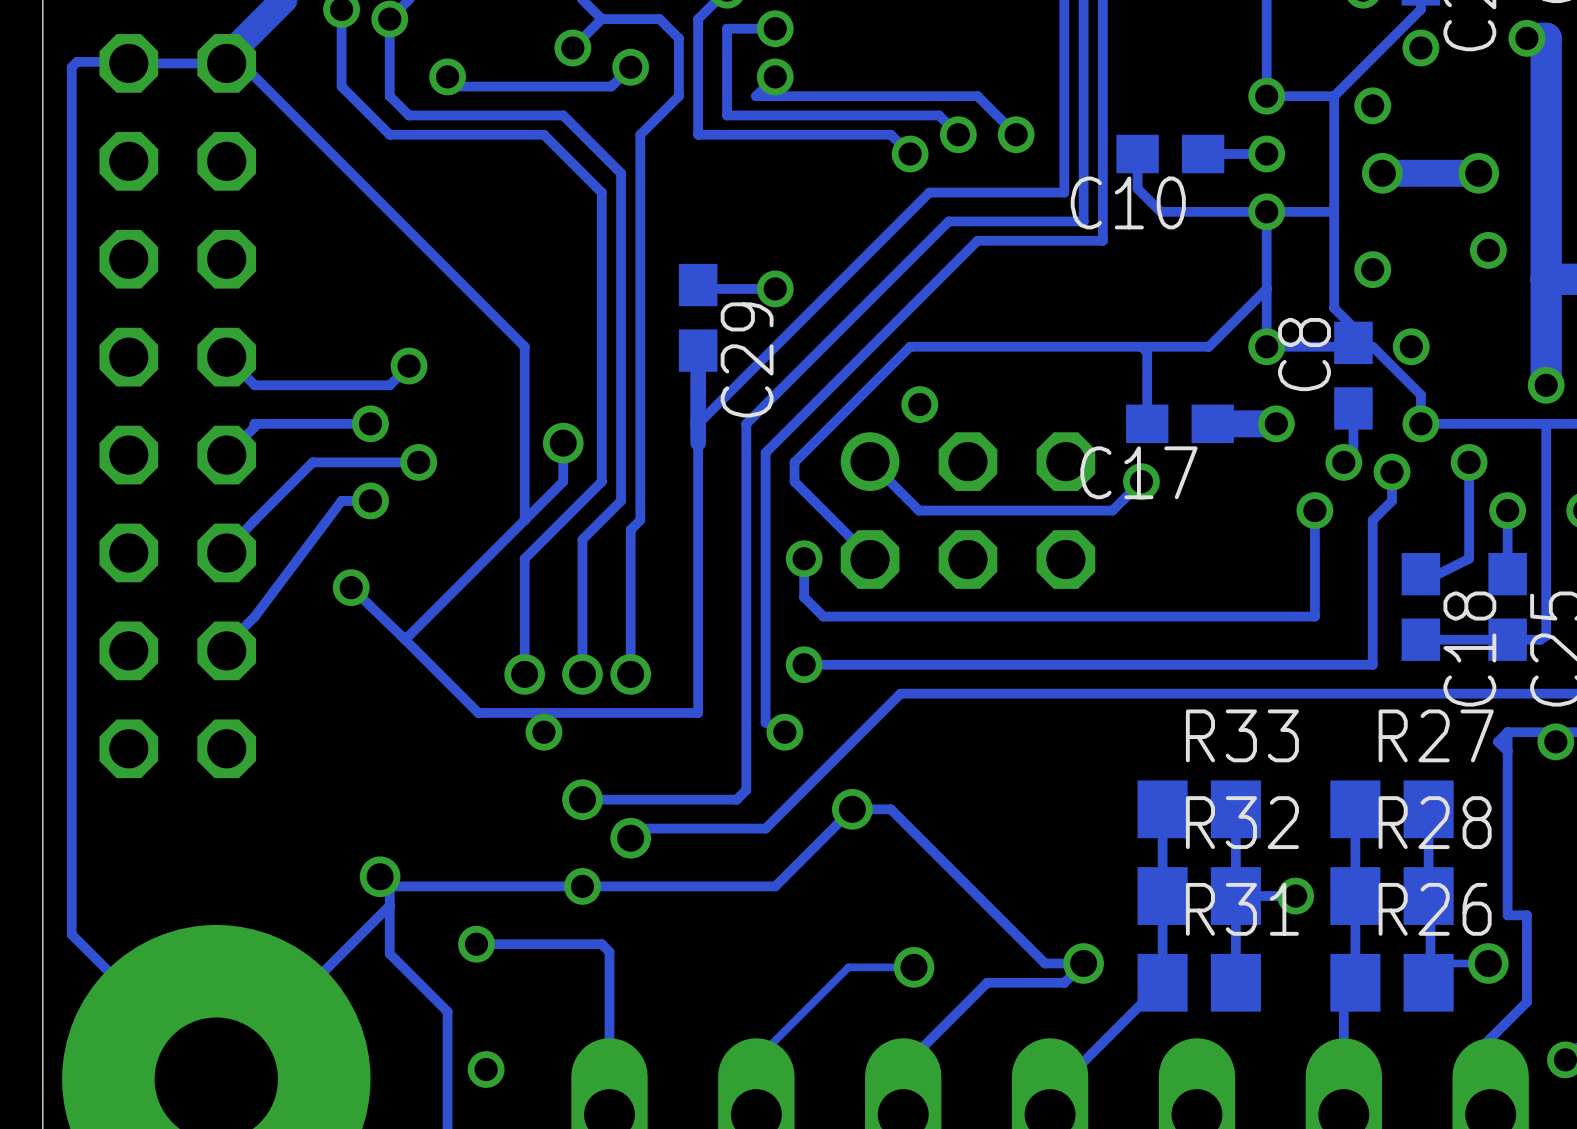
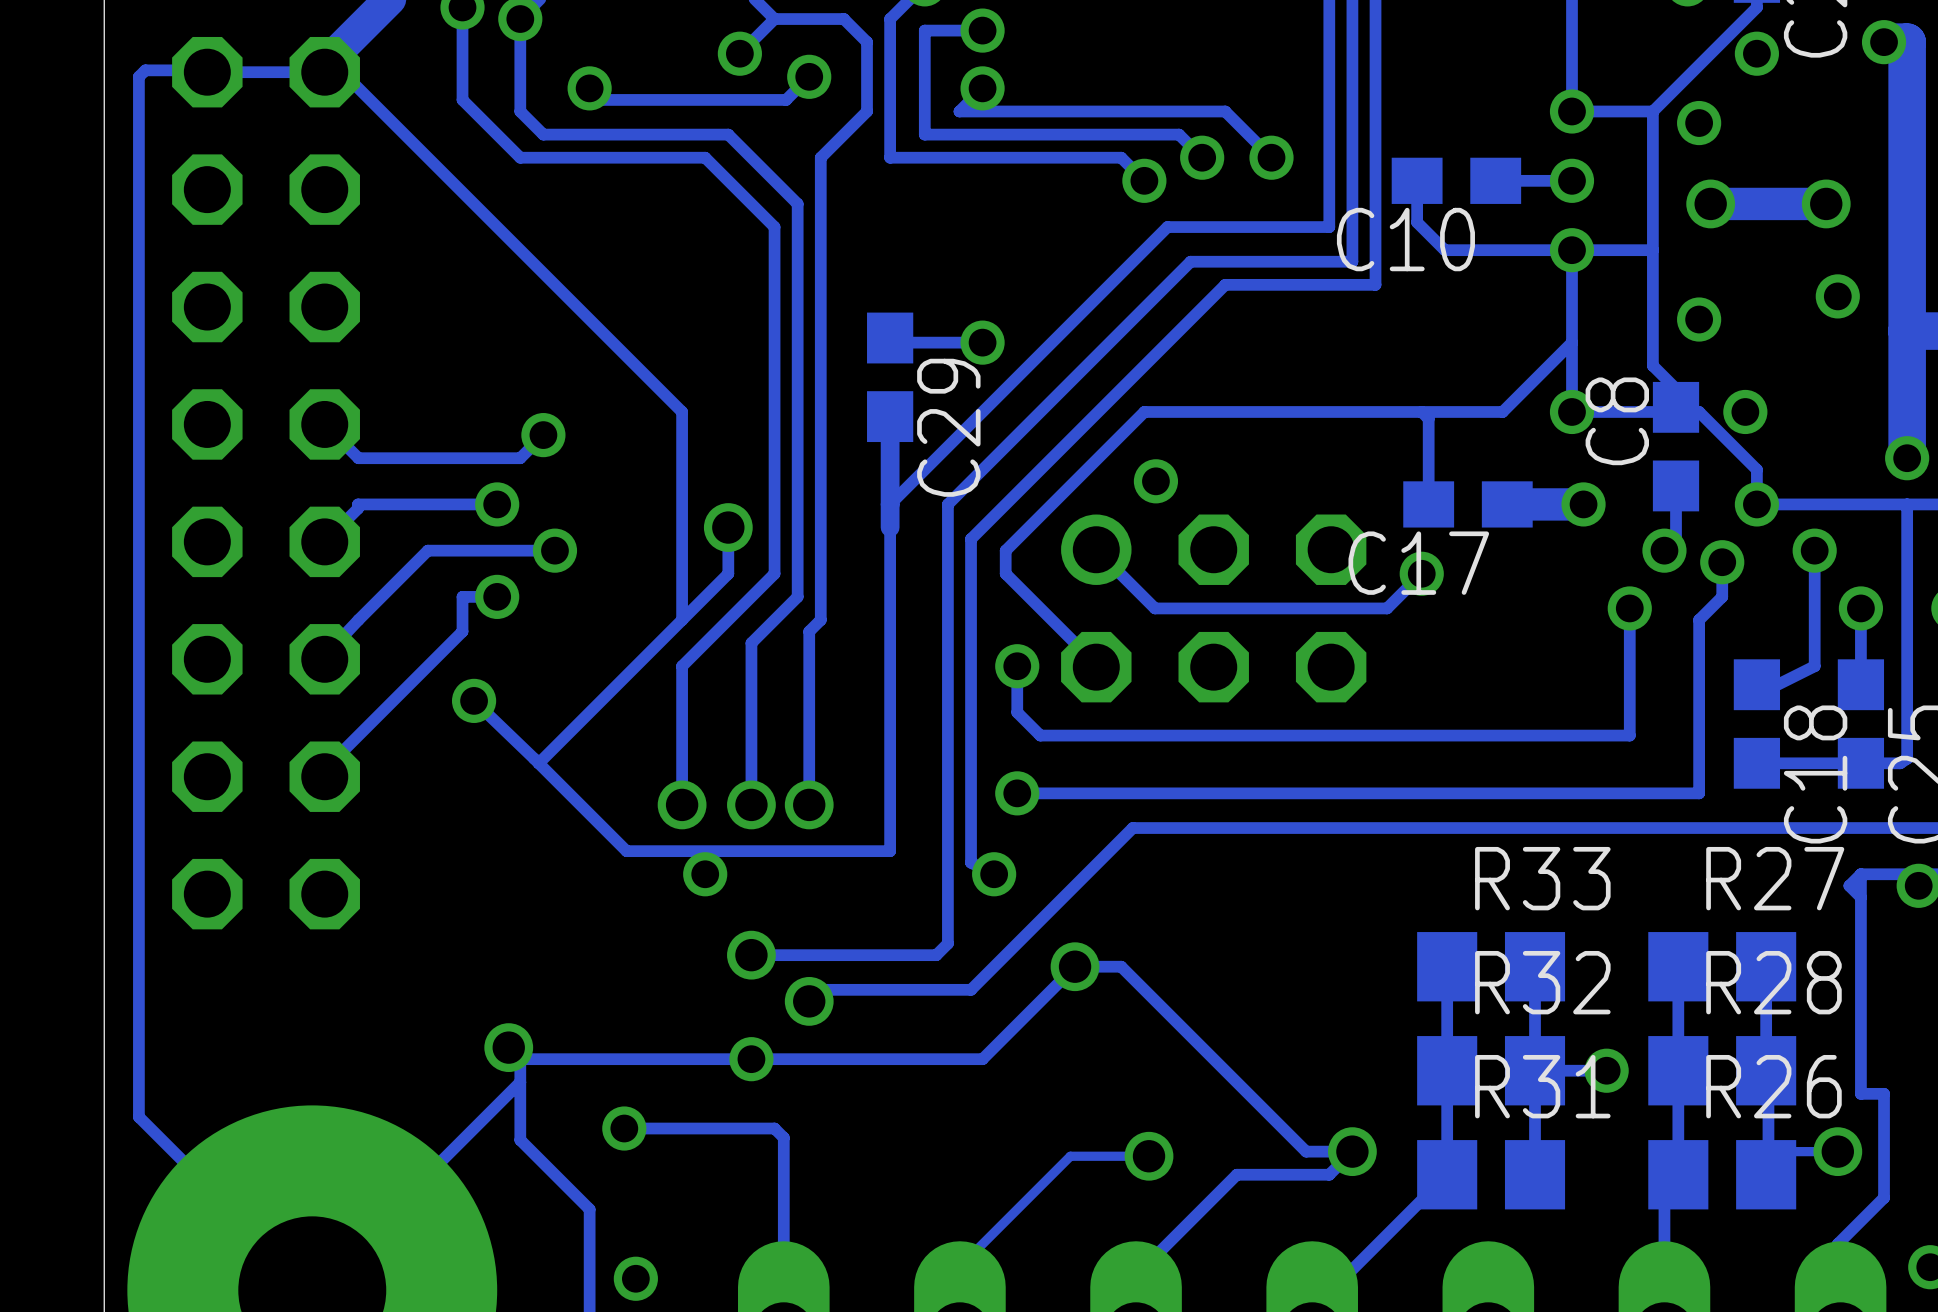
track: (341, 500) (254, 616) -> (462, 596) (462, 631) (358, 735)

